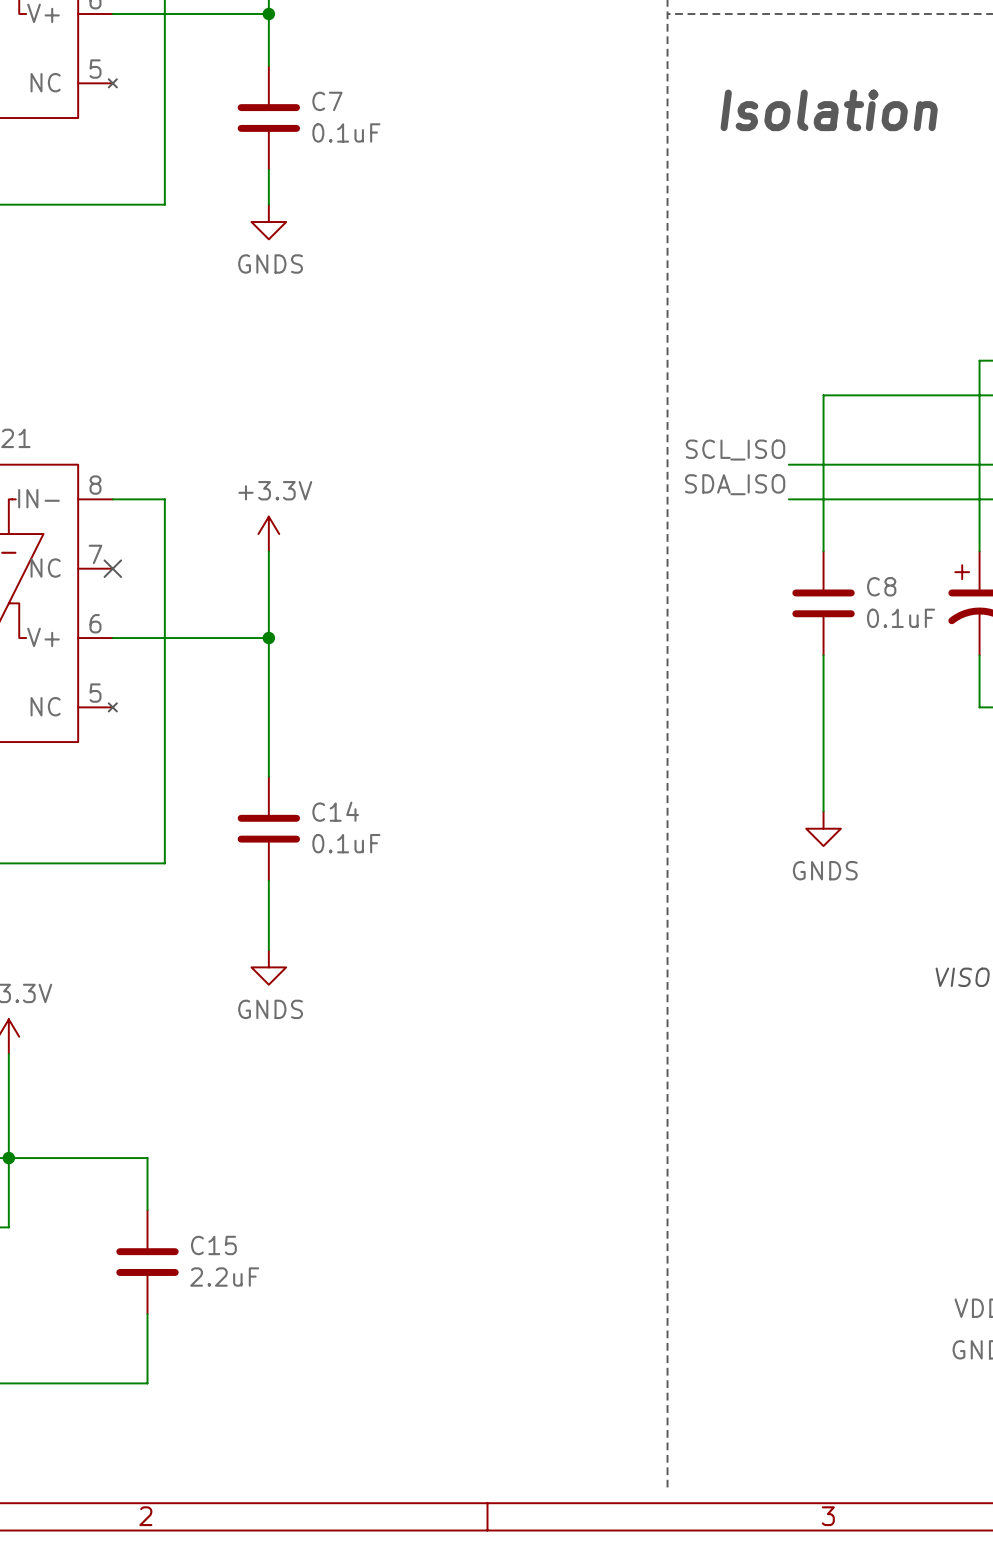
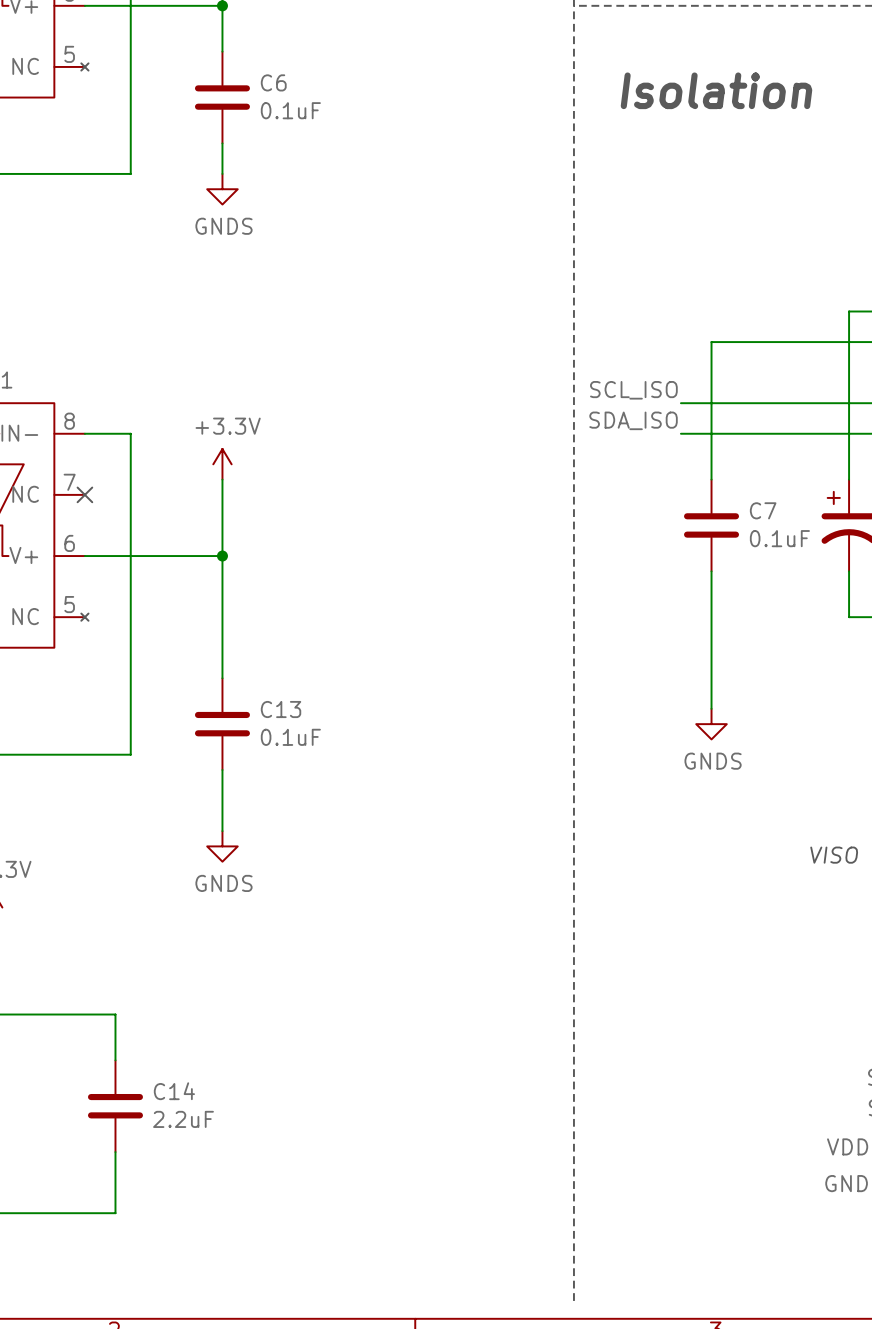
C7 name: C7 (327, 101) -> C6 (273, 82)
C8 name: C8 (881, 586) -> C7 (763, 510)
C14 name: C14 (335, 811) -> C13 (281, 709)
C15 name: C15 (213, 1245) -> C14 (174, 1091)

